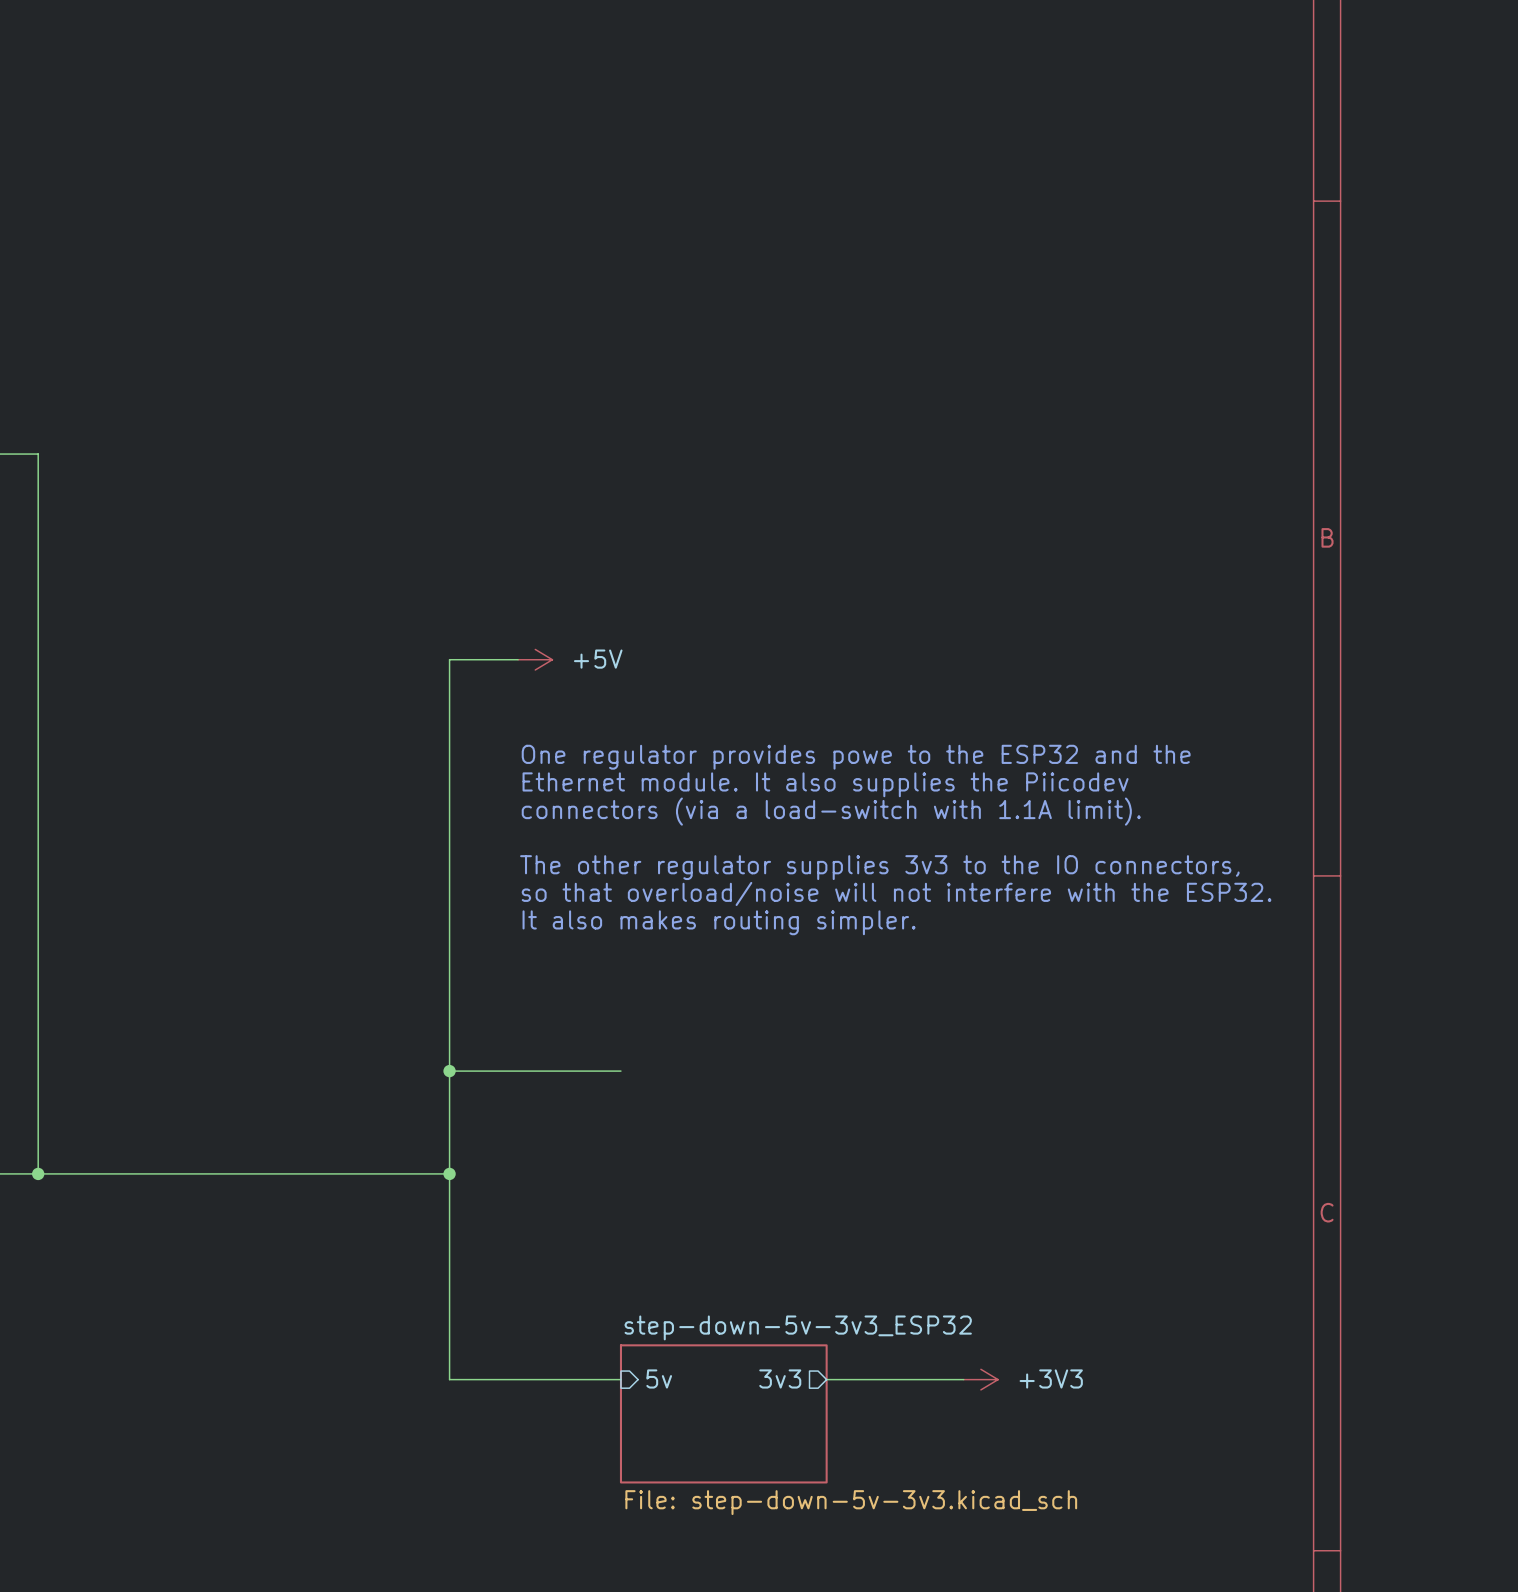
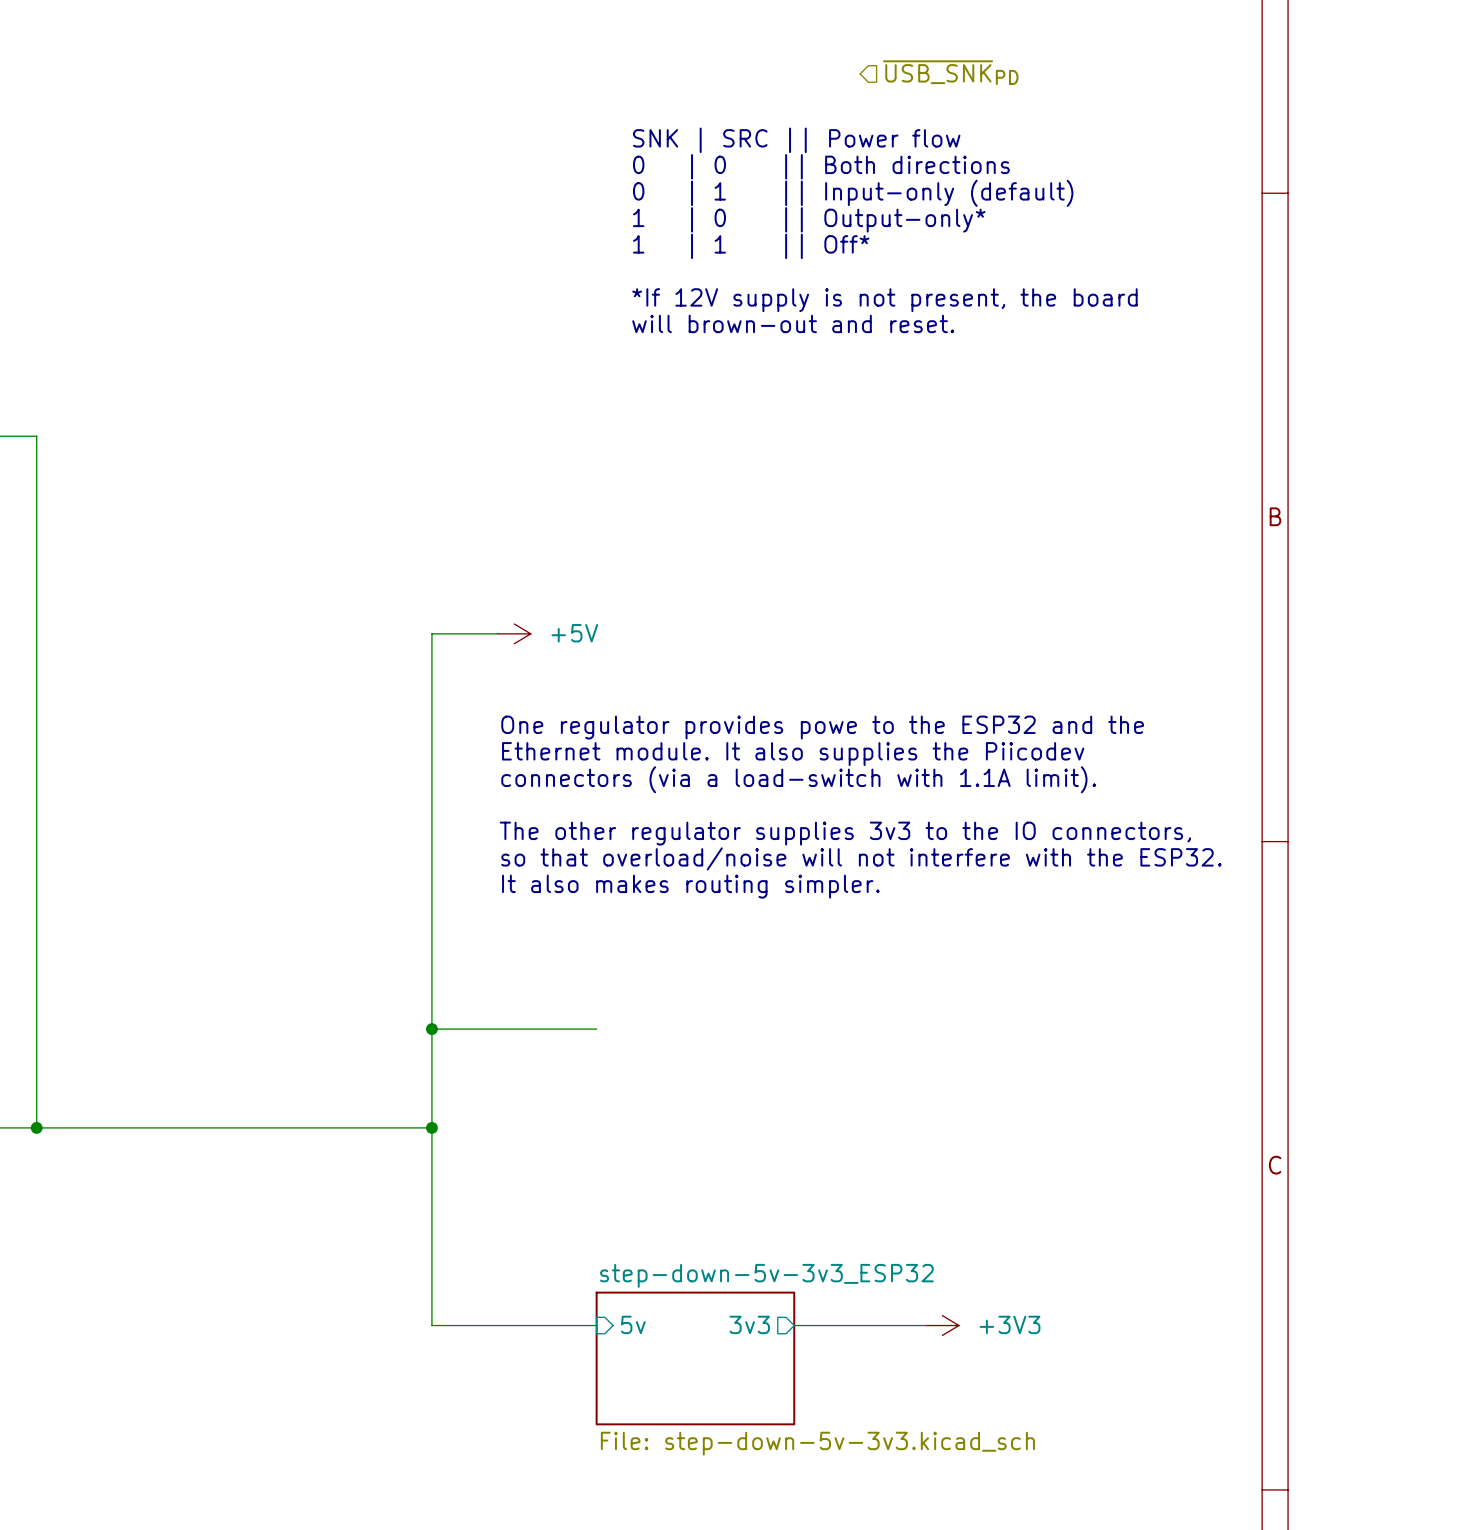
hierarchical label: none -> ~{USB_SNK}PD (950, 72)
text: none -> SNK | SRC || Power flow (796, 140)
text: none -> 0 | 0 || Both directions (821, 166)
text: none -> 0 | 1 || Input-only (default) (853, 193)
text: none -> 1 | 0 || Output-only* (809, 219)
text: none -> 1 | 1 || Off* (751, 246)
text: none -> *If 12V supply is not present, the board (884, 300)
text: none -> will brown-out and reset. (793, 323)

